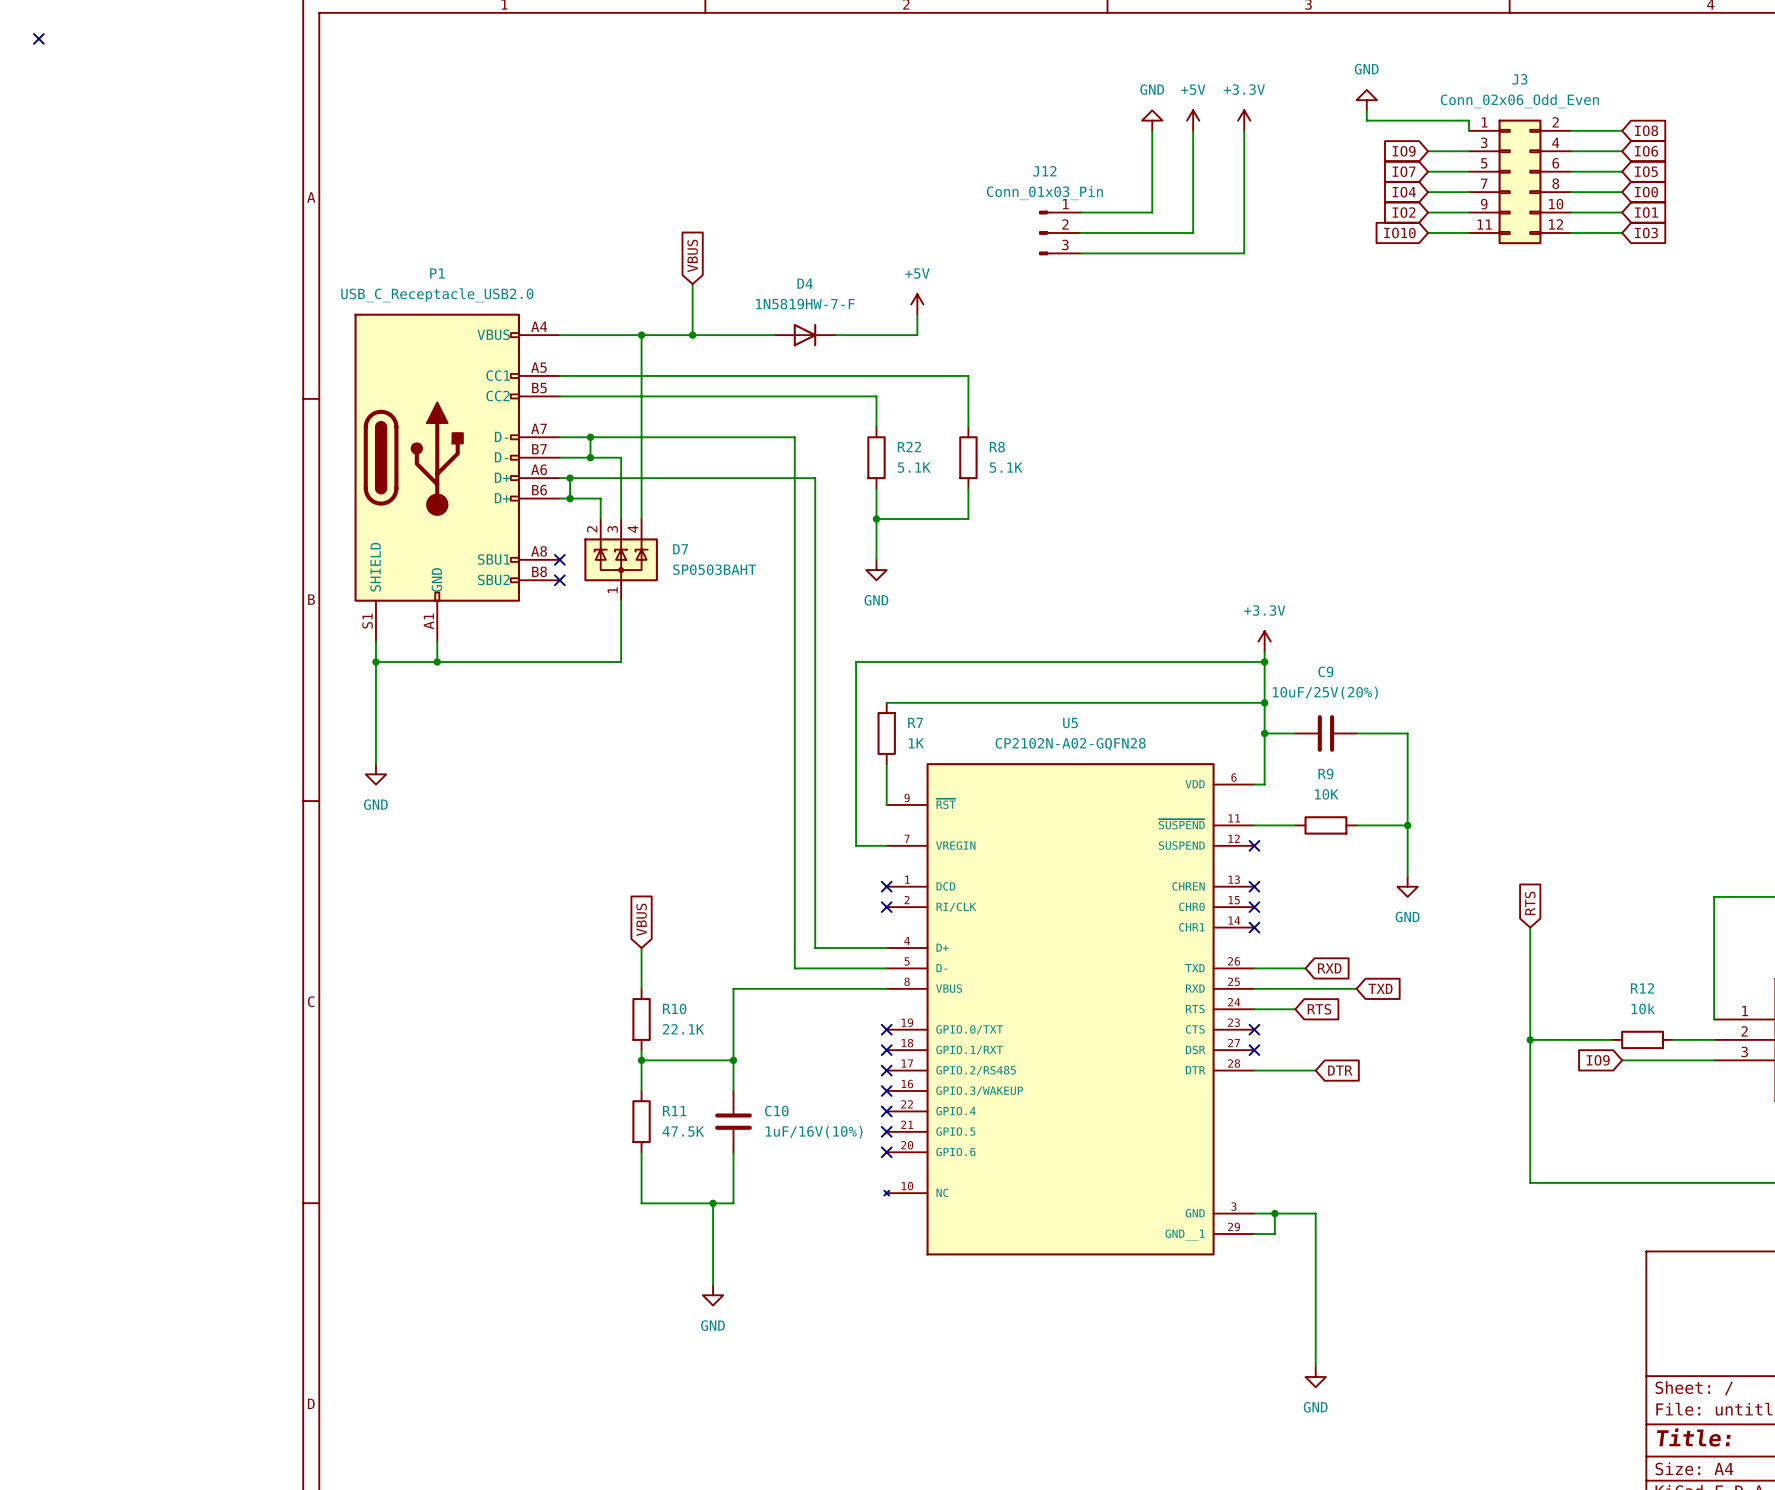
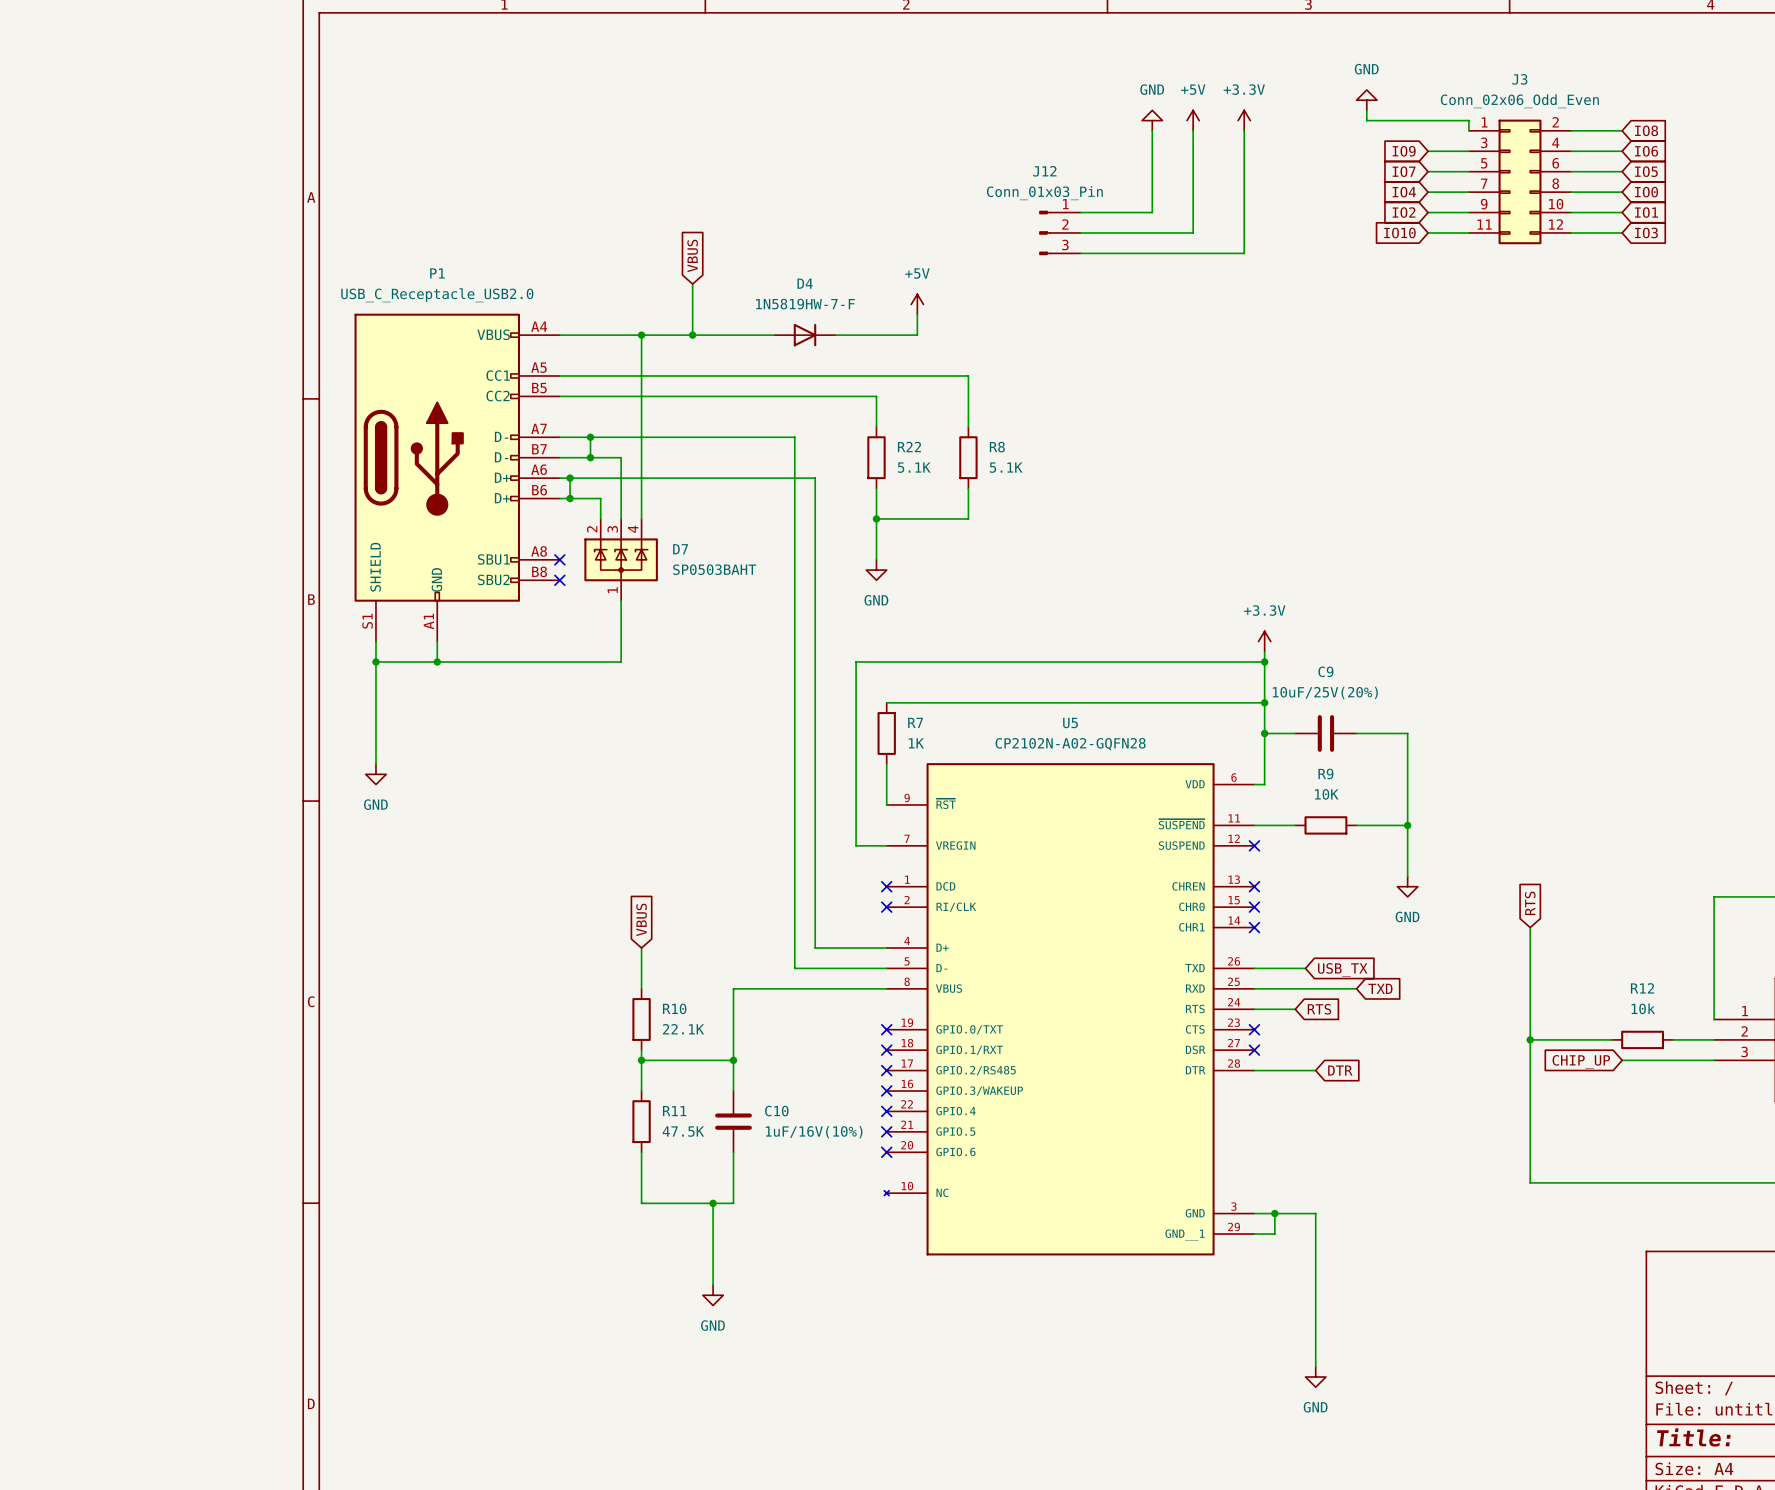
no-connect mark: (38, 38) -> none
global label: RXD (1329, 968) -> USB_TX (1342, 969)
global label: IO9 (1598, 1060) -> CHIP_UP (1581, 1061)

